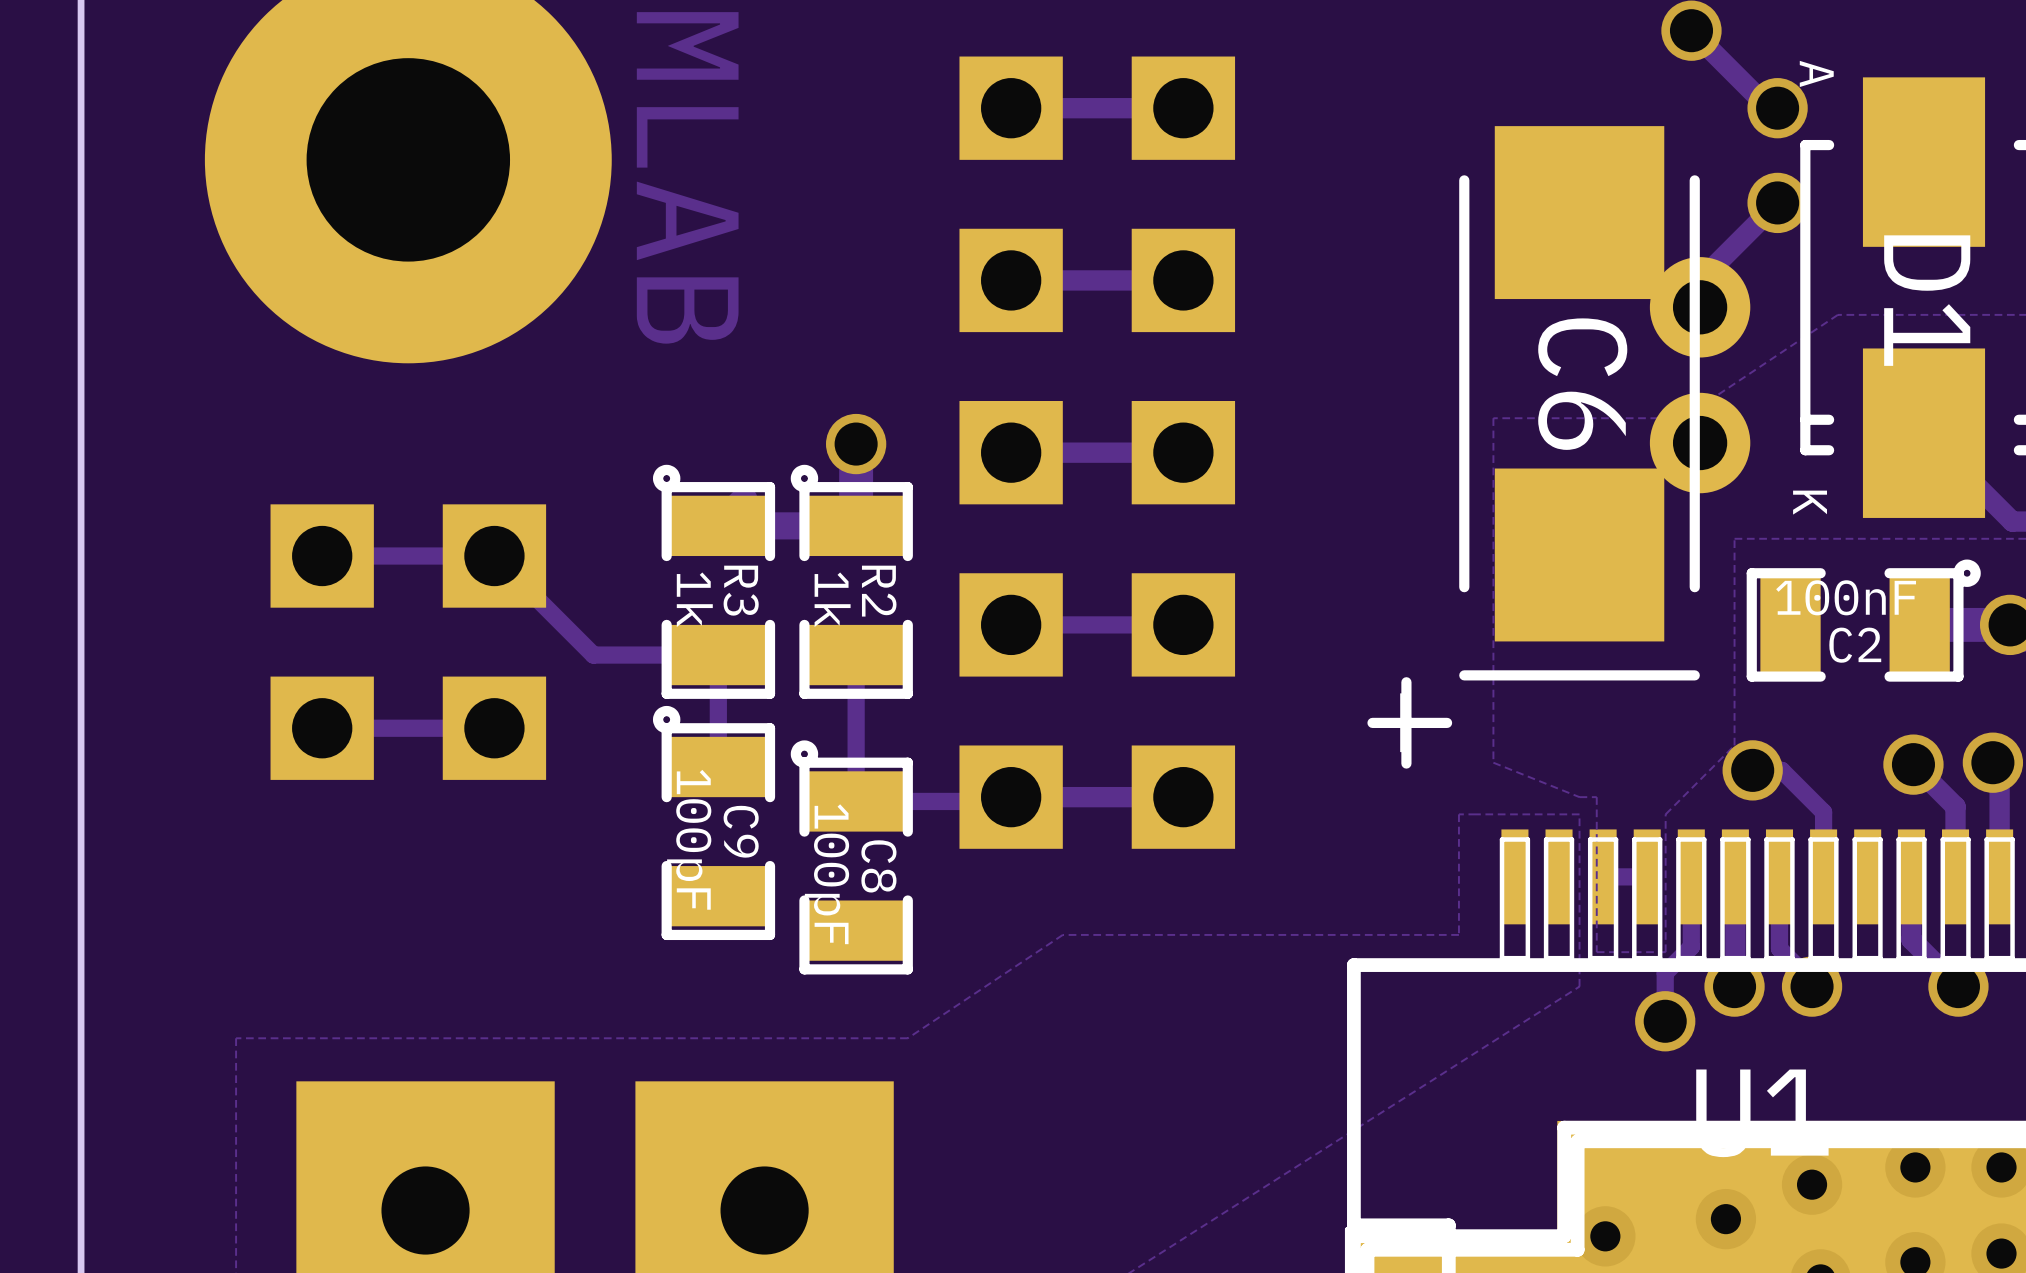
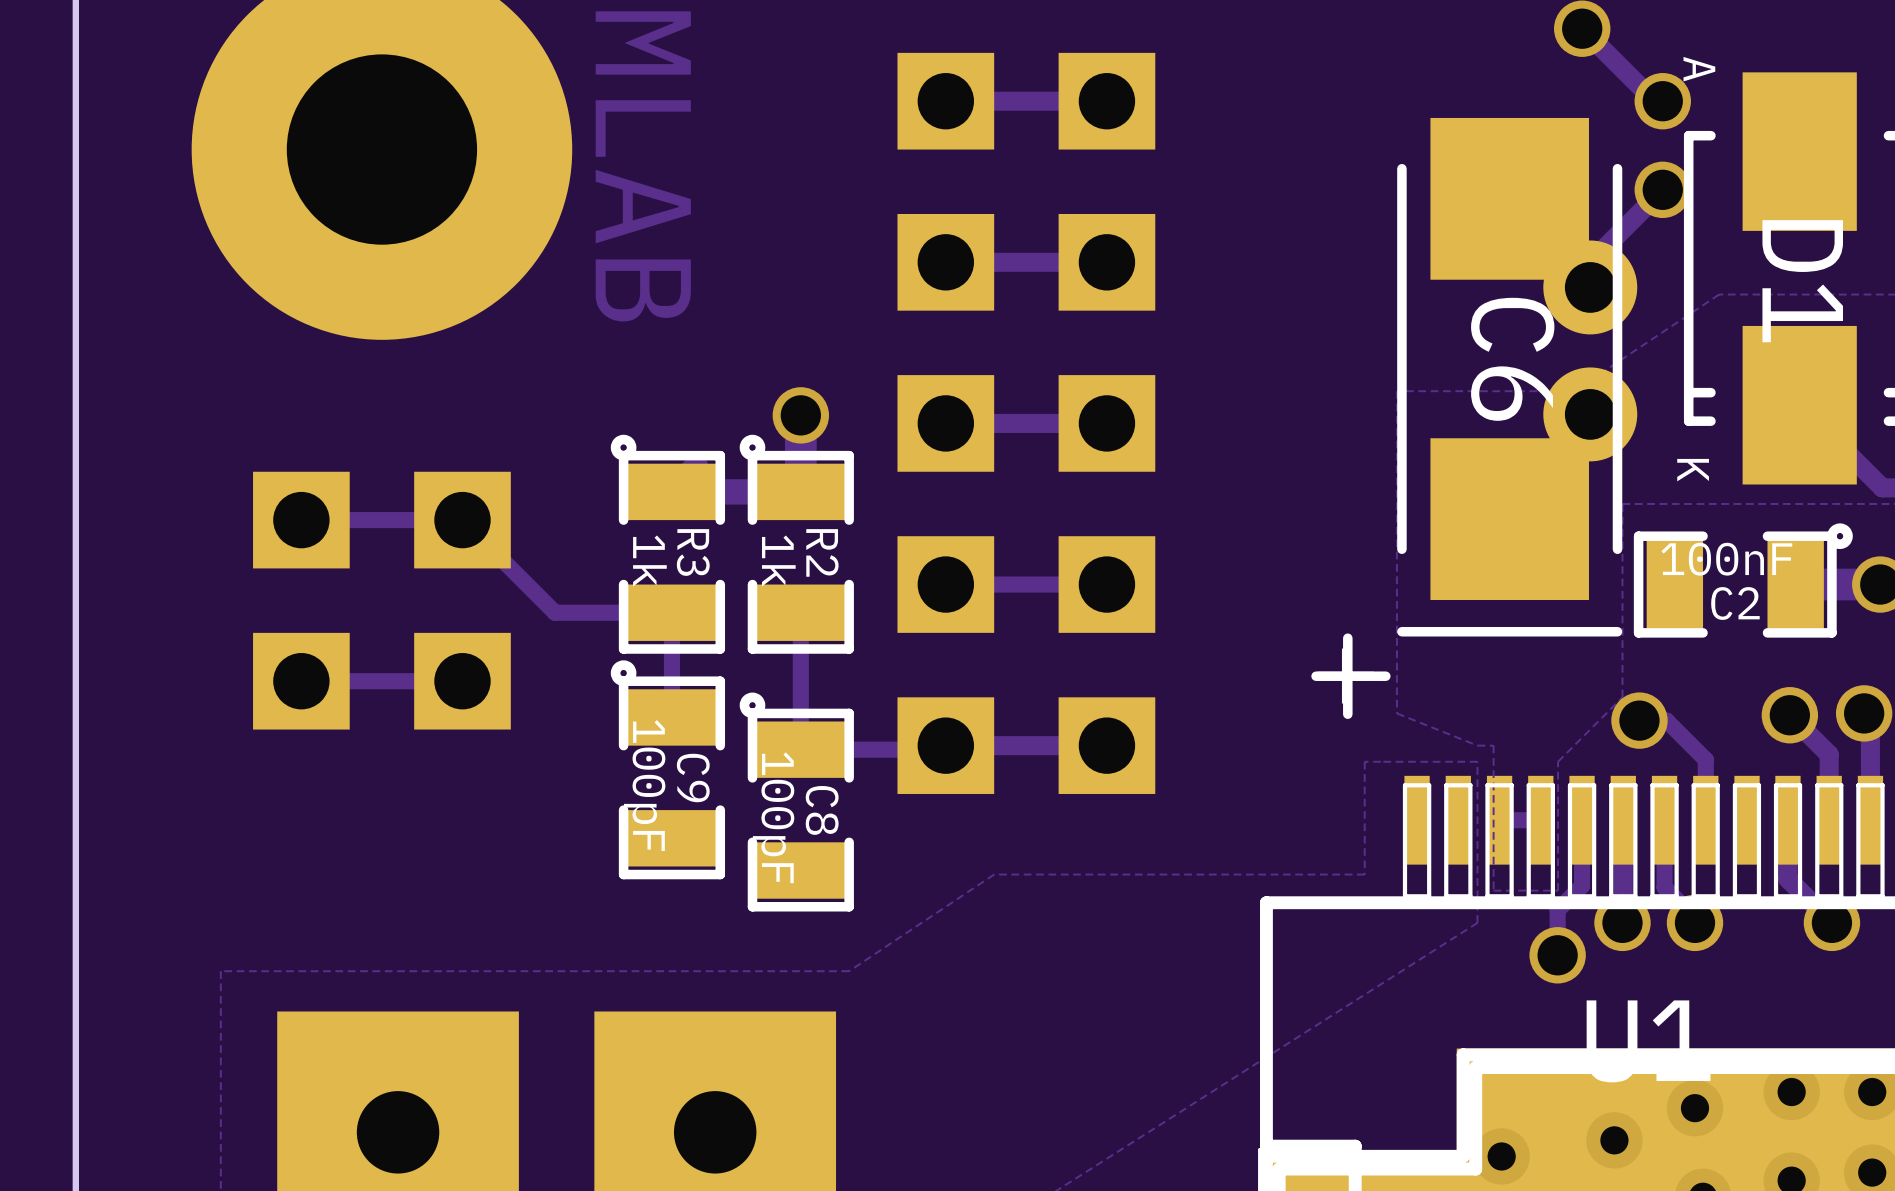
C6 position: (1533, 447) -> (1466, 418)

